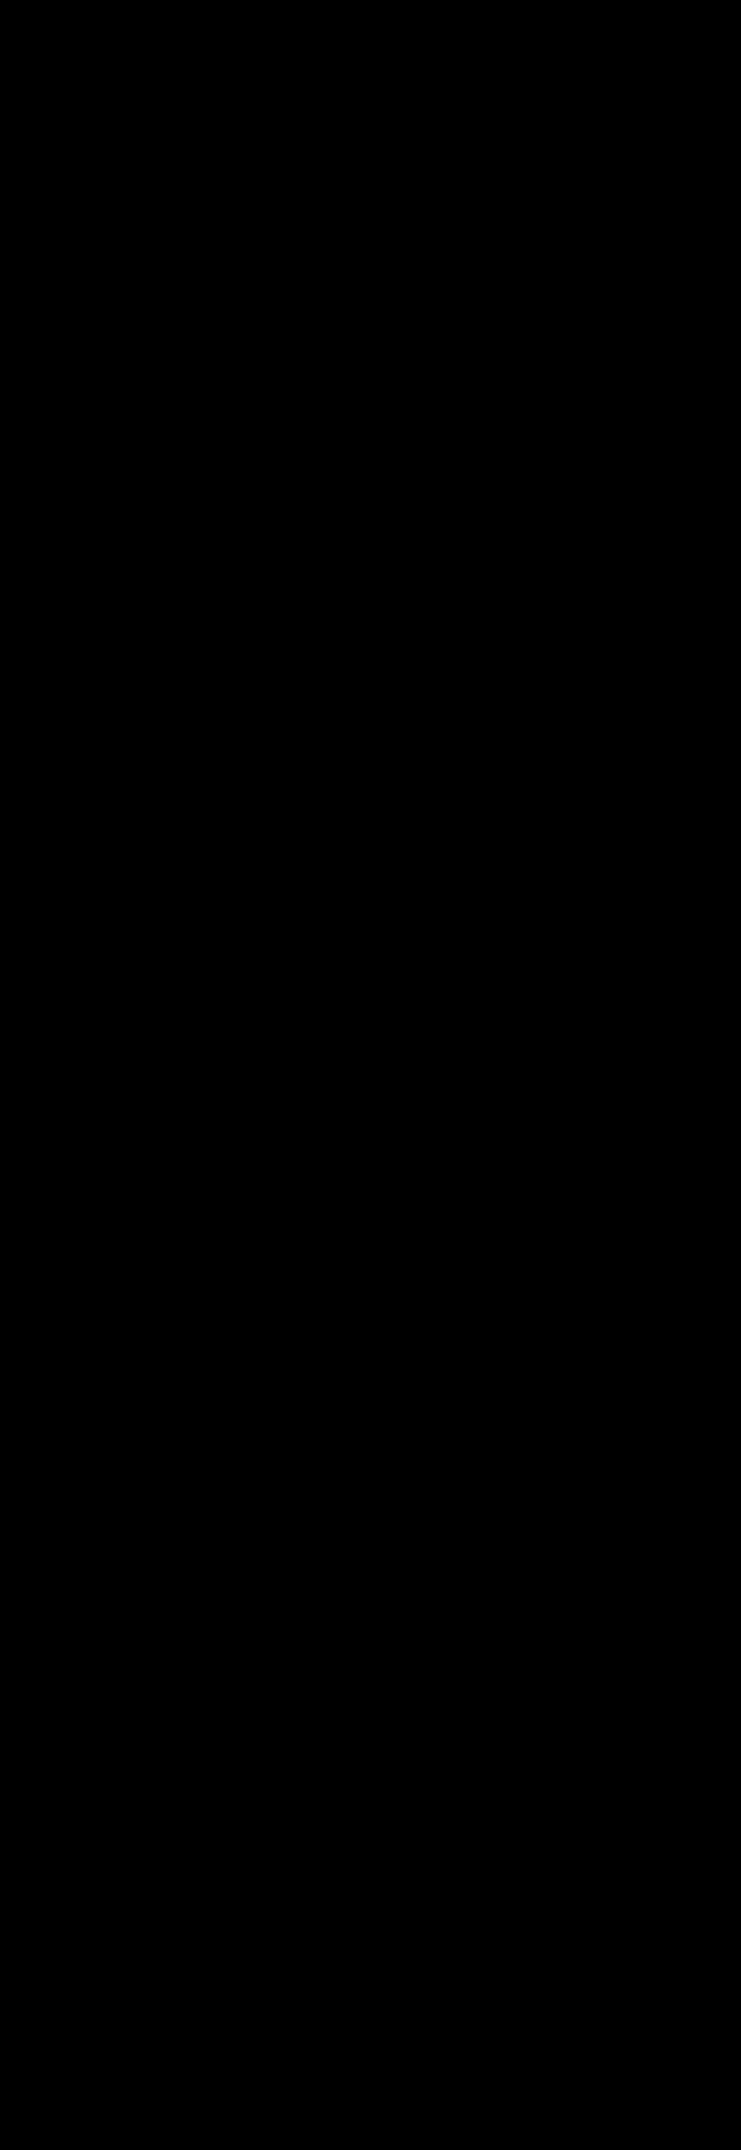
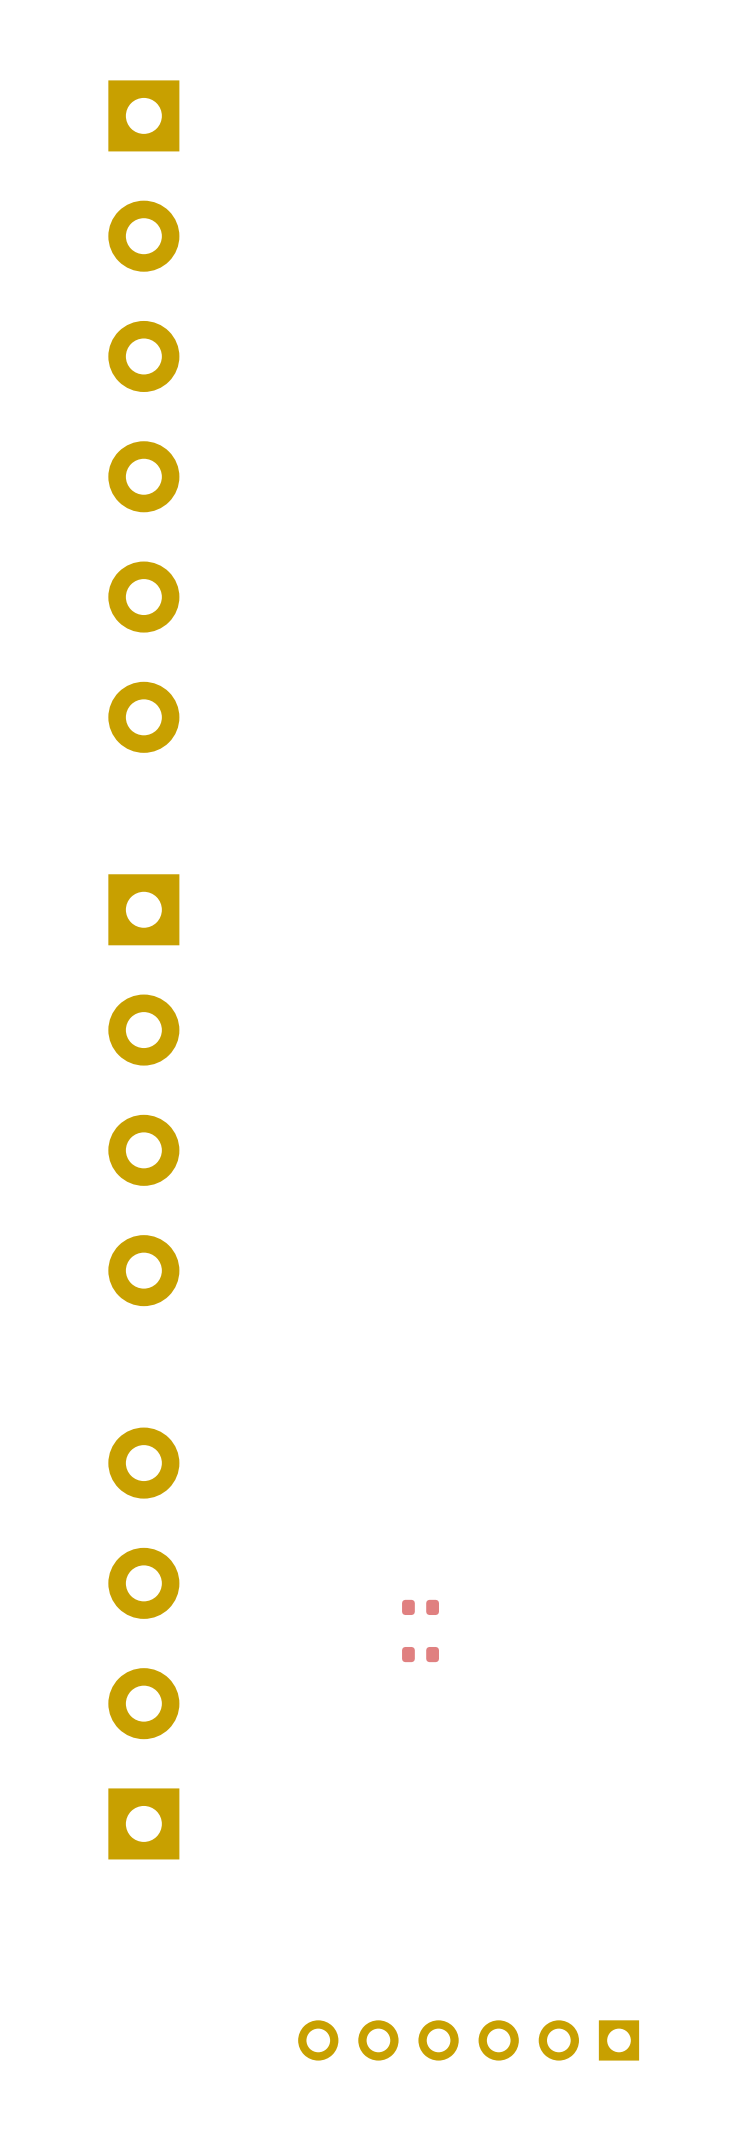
part: none -> (143, 416)
part: none -> (143, 1090)
part: none -> (420, 1607)
part: none -> (143, 1643)
part: none -> (420, 1654)
part: none -> (468, 2040)

